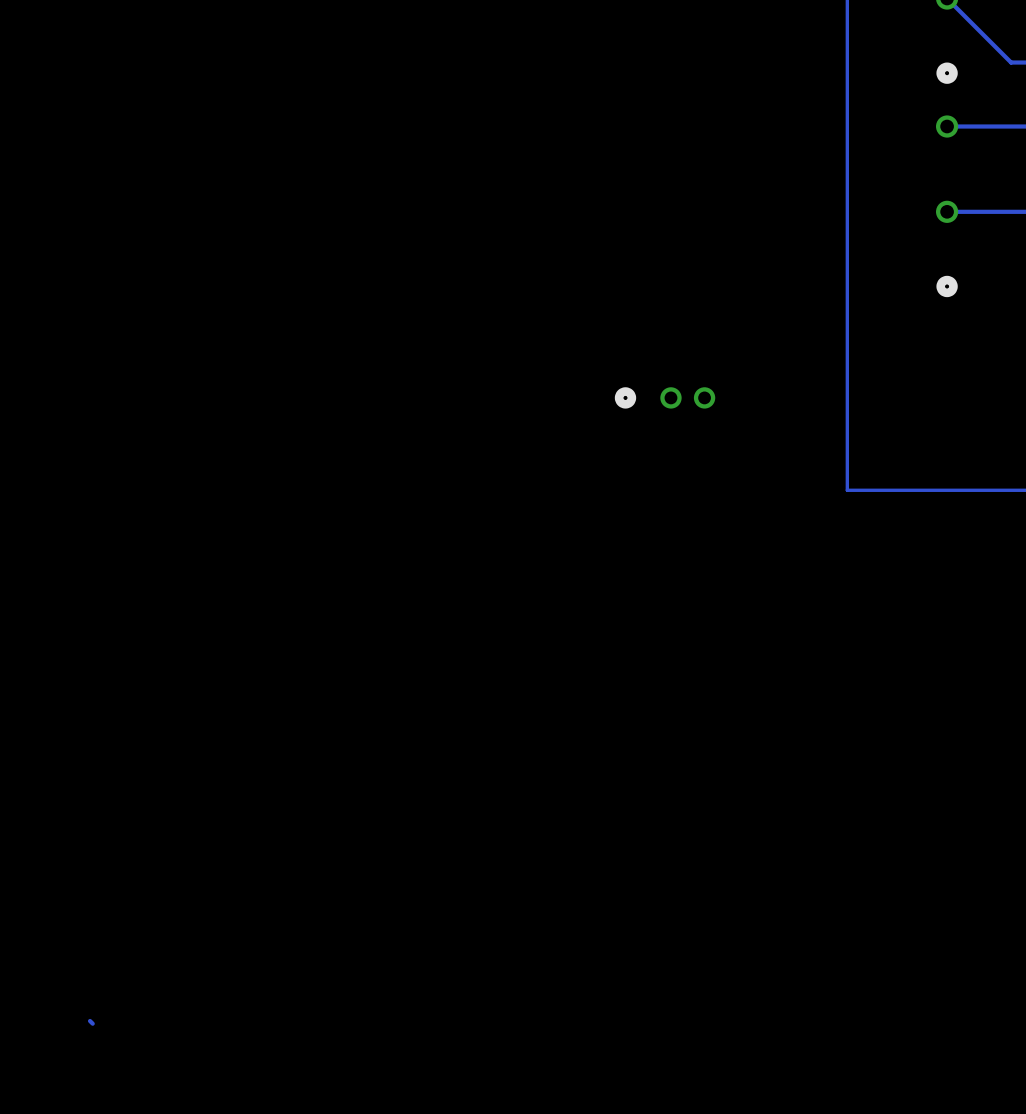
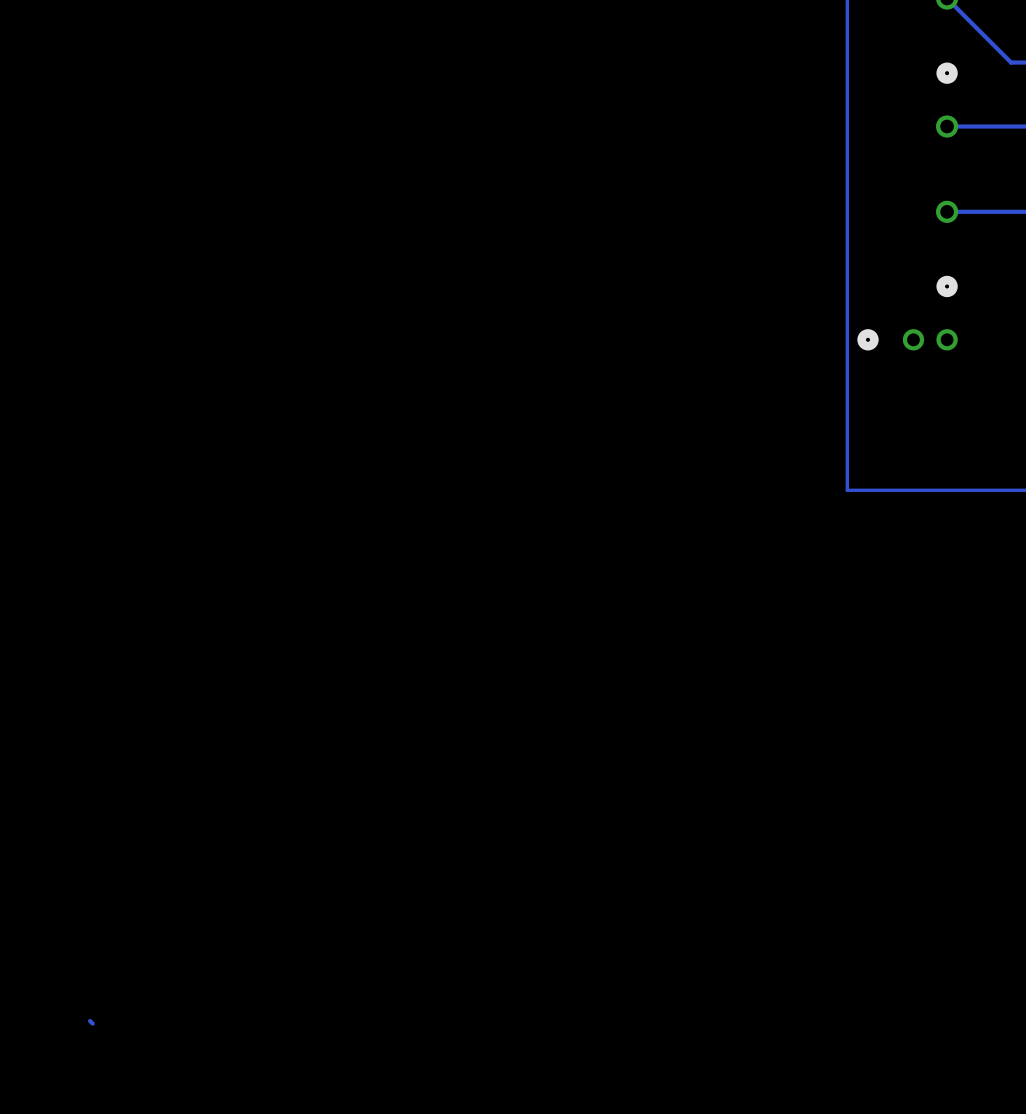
part position: (665, 397) -> (907, 339)

